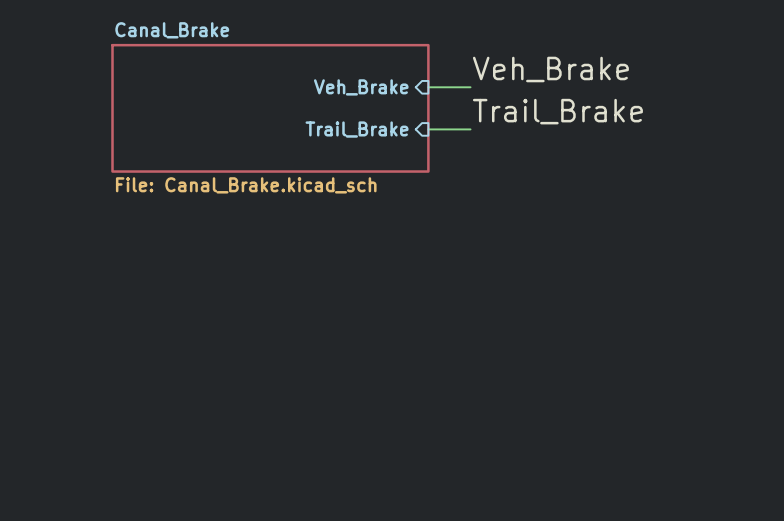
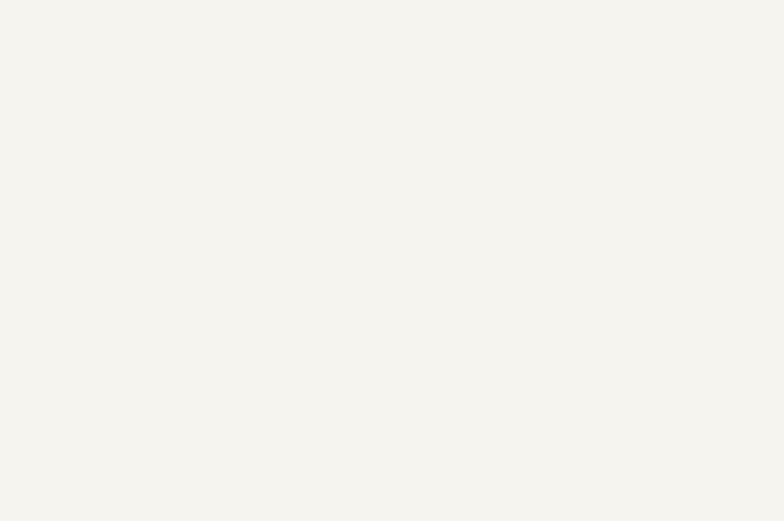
label: Veh_Brake (550, 69) -> none
sheet pin: Veh_Brake (361, 87) -> none
wire: (428, 87) (470, 87) -> none
sheet Canal_Brake: File: Canal_Brake.kicad_sch (270, 108) -> none
label: Trail_Brake (557, 111) -> none
sheet pin: Trail_Brake (357, 129) -> none
wire: (428, 129) (470, 129) -> none

